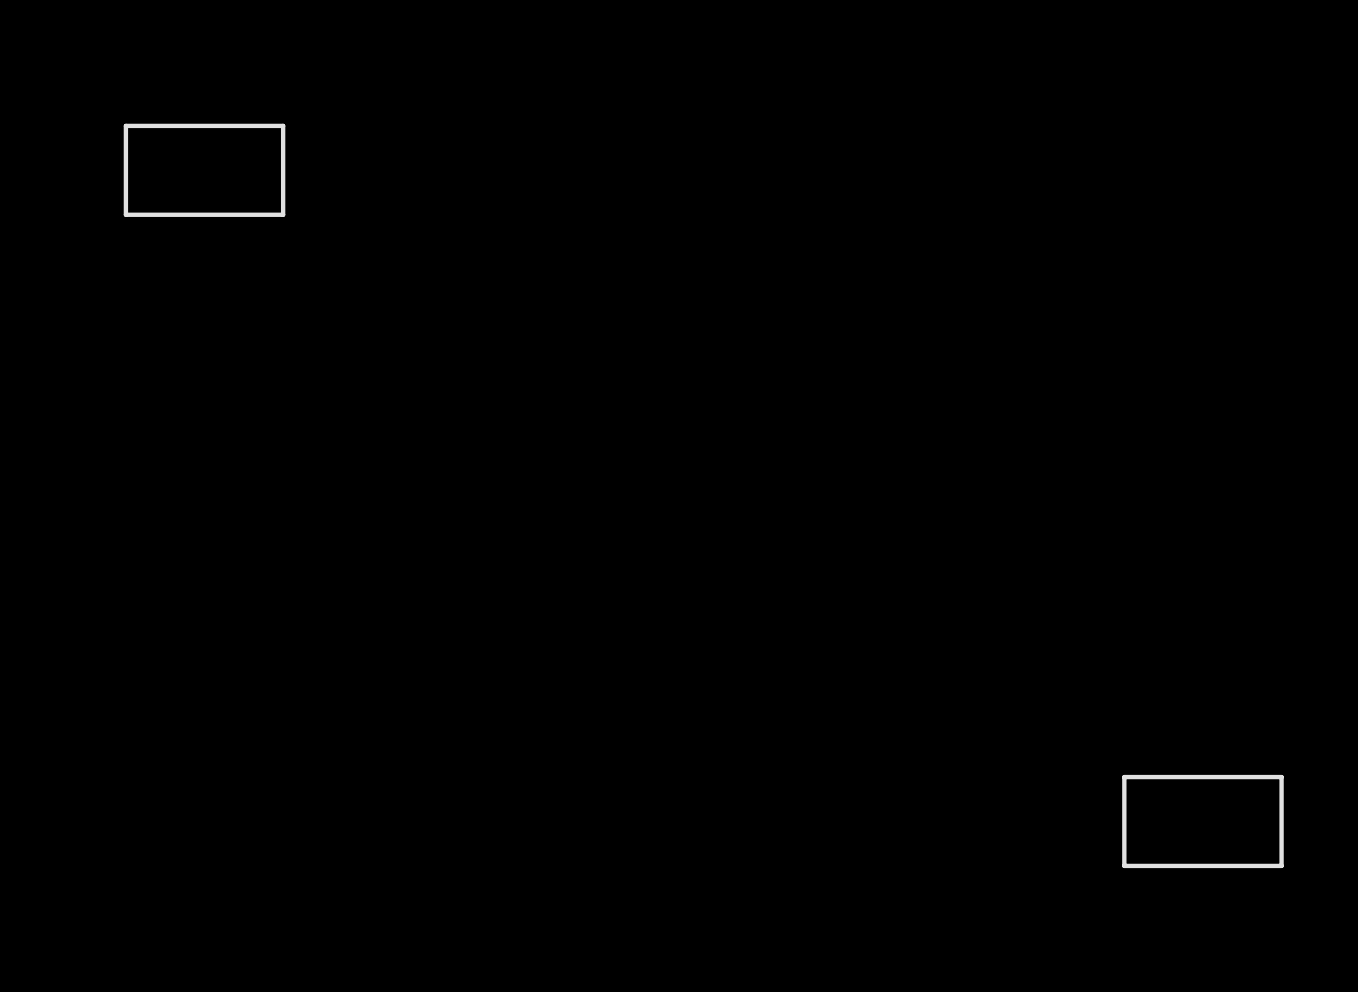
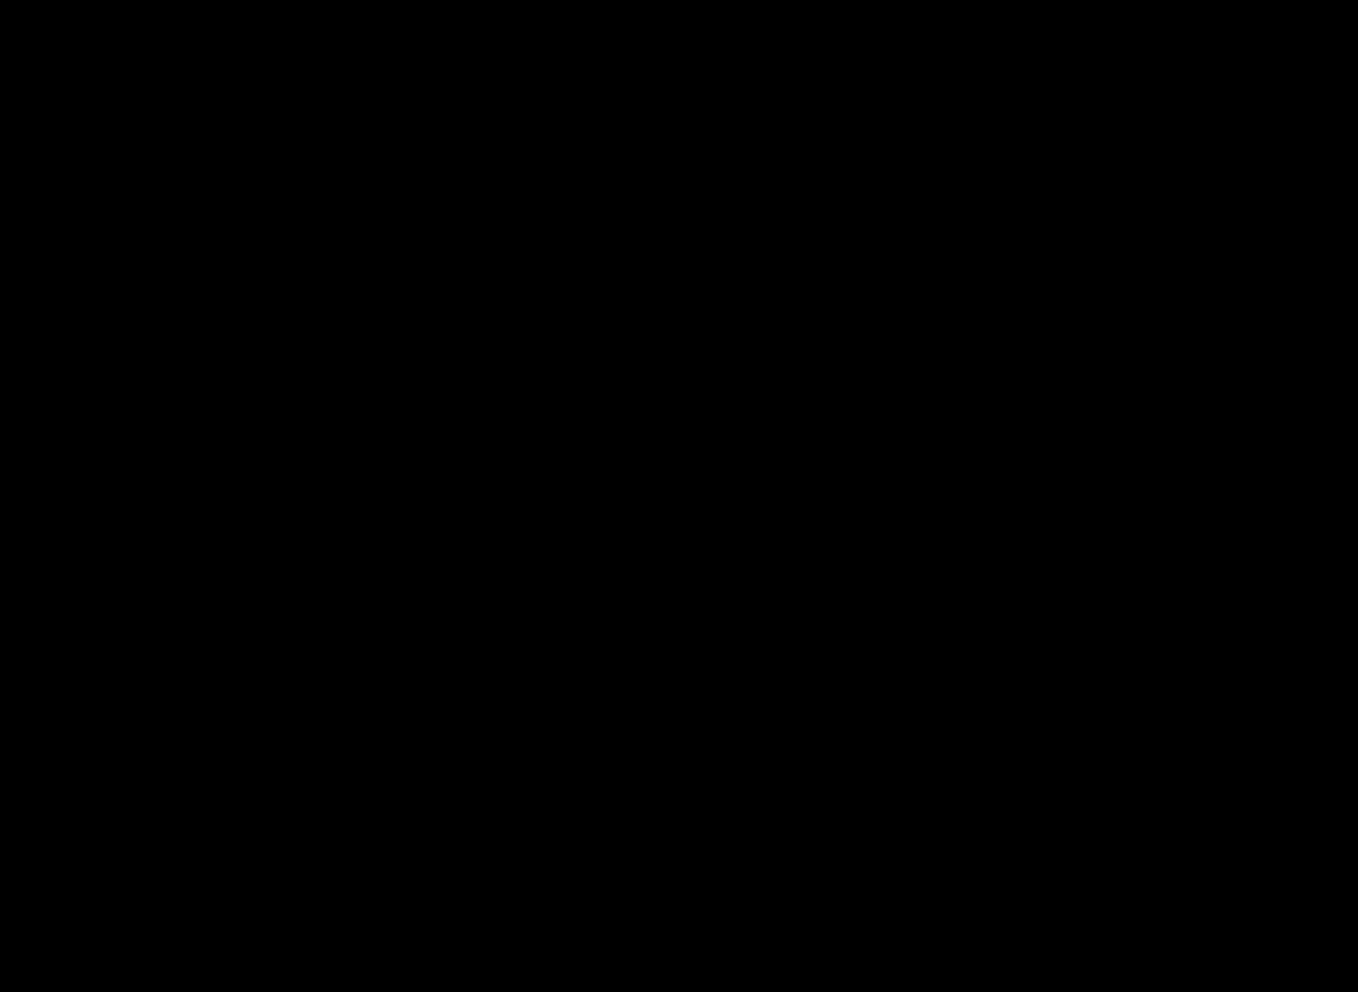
part: (204, 170) -> none
part: (1202, 821) -> none

